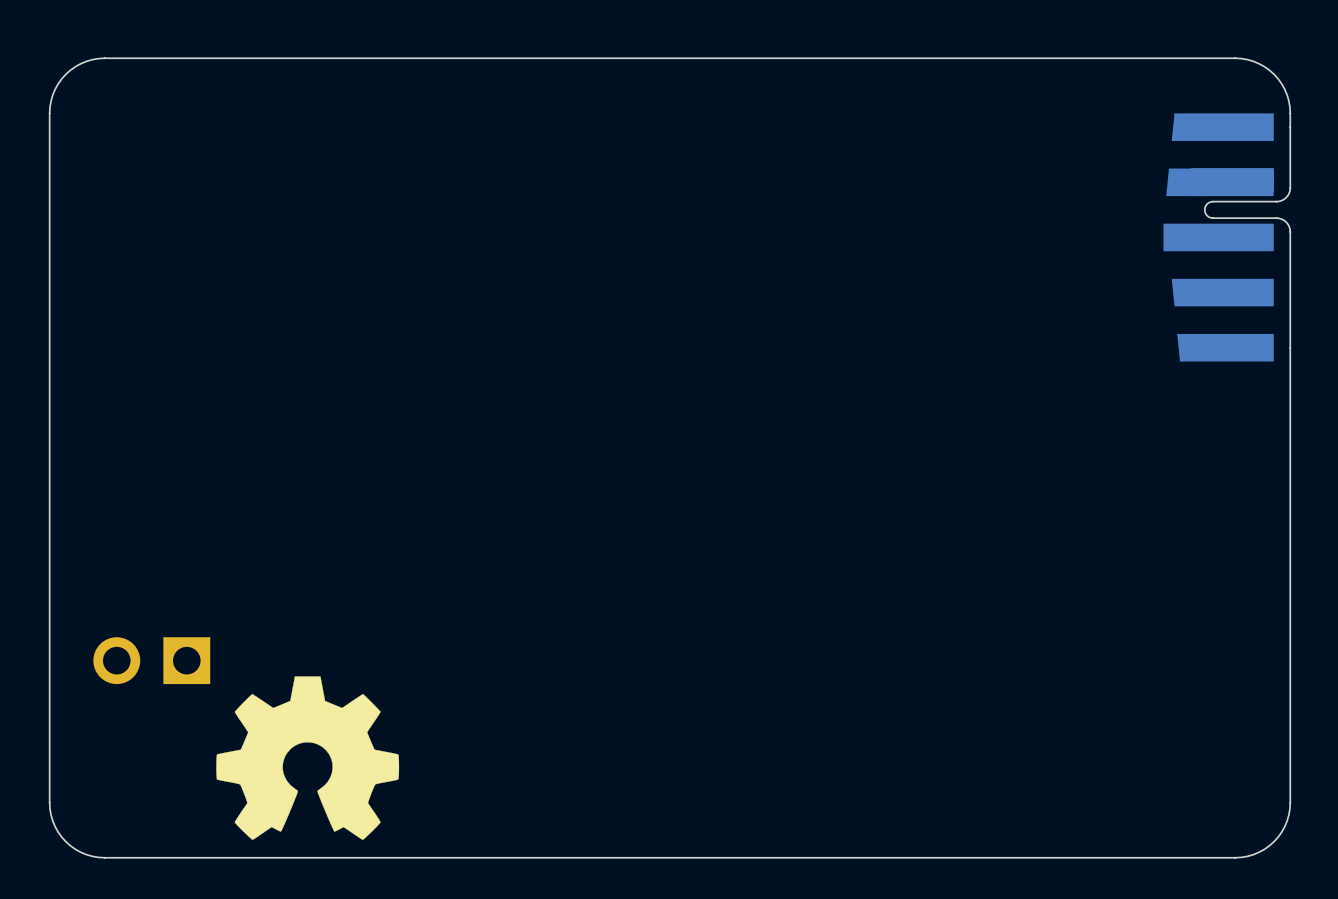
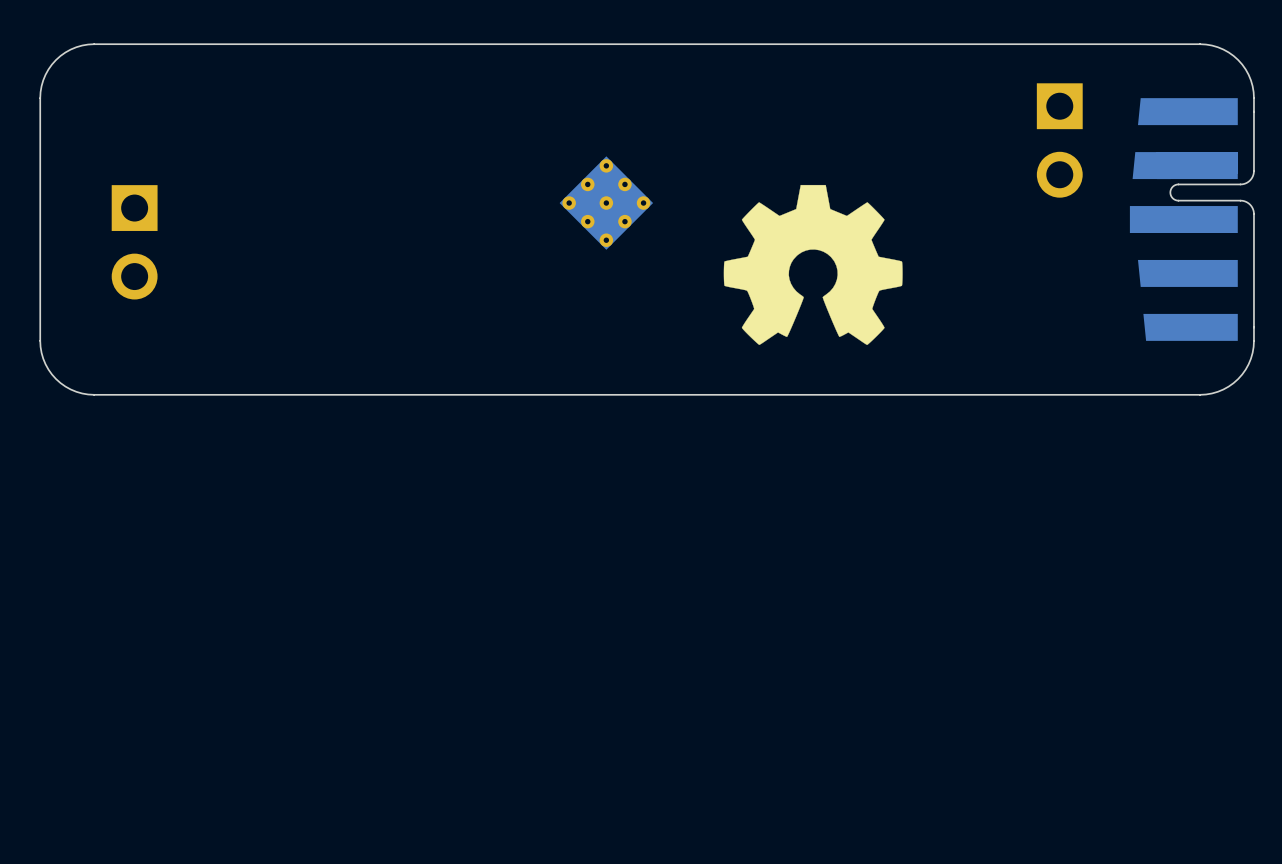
part: none -> (1059, 140)
drawing: none -> [723, 184, 903, 346]
part: none -> (606, 203)
board edge: (1290, 361) (1289, 808) (1281, 831) (1269, 845) (1253, 854) (1235, 857) (104, 857) (80, 852) (61, 837) (52, 820) (49, 808) (49, 361) -> (1253, 340) (1248, 364) (1238, 379) (1217, 391) (1200, 394) (94, 394) (76, 391) (56, 379) (43, 358) (40, 340)
part rotation: 0° (151, 660) -> 90° counterclockwise (134, 242)
part position: (151, 660) -> (134, 242)
drawing: [216, 676, 400, 840] -> none

